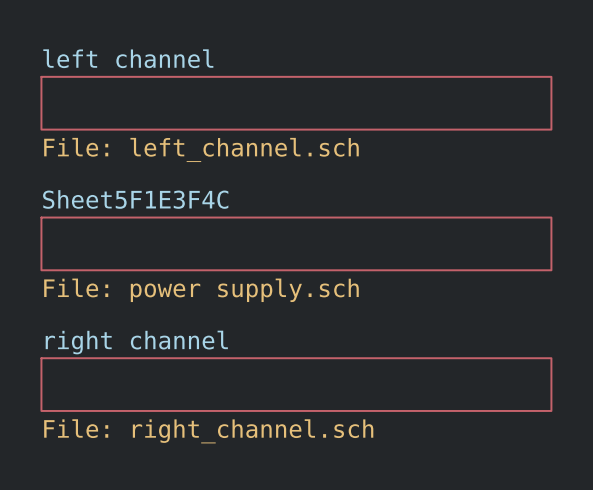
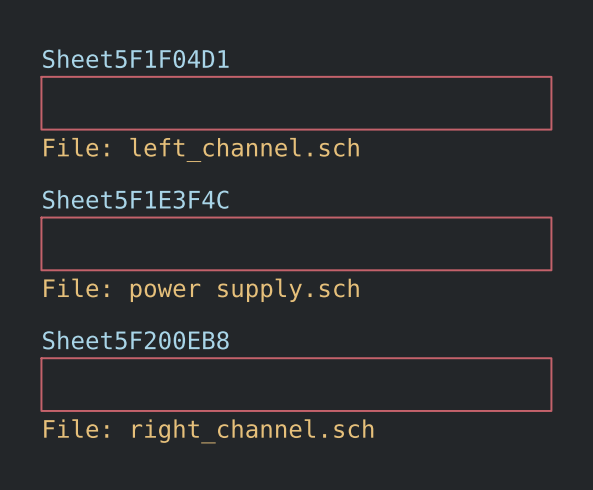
sheet left channel name: left channel (128, 58) -> Sheet5F1F04D1 (135, 58)
sheet right channel name: right channel (136, 342) -> Sheet5F200EB8 (135, 340)

